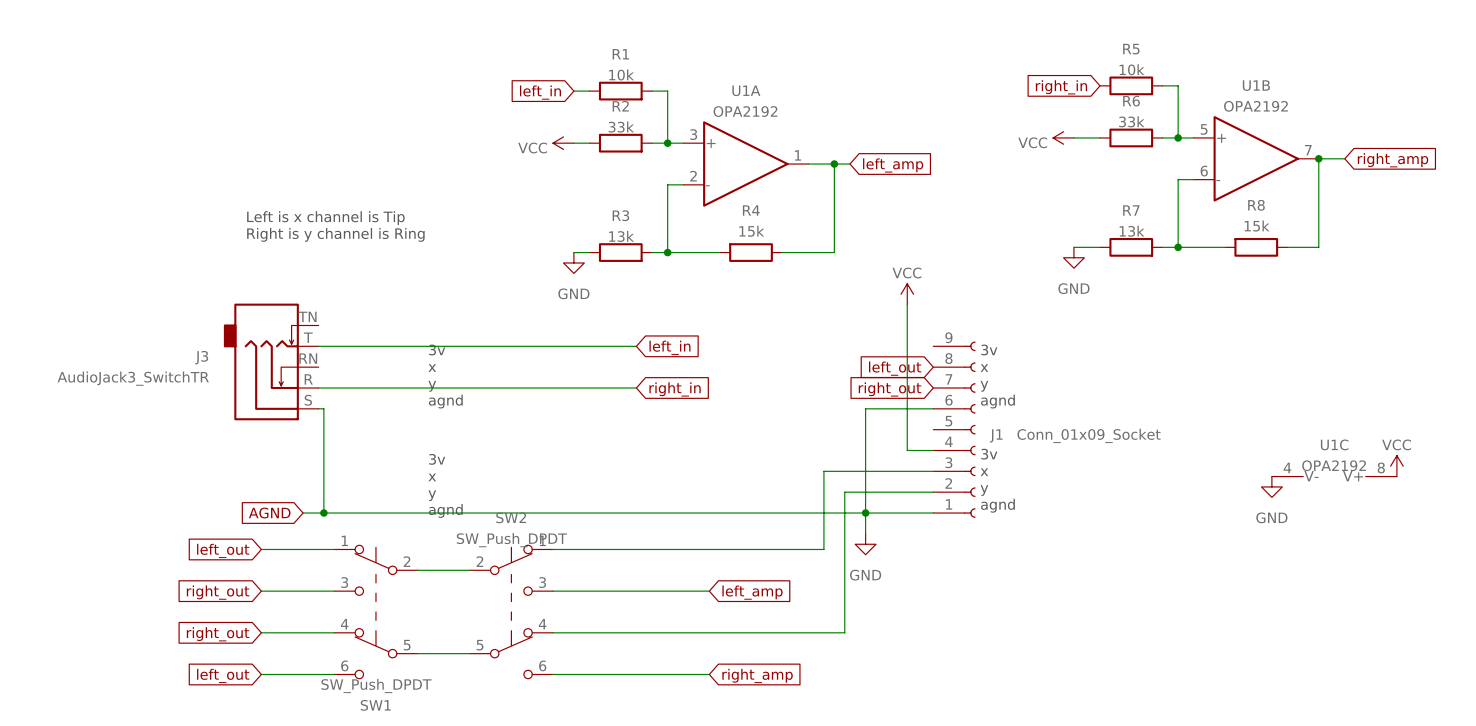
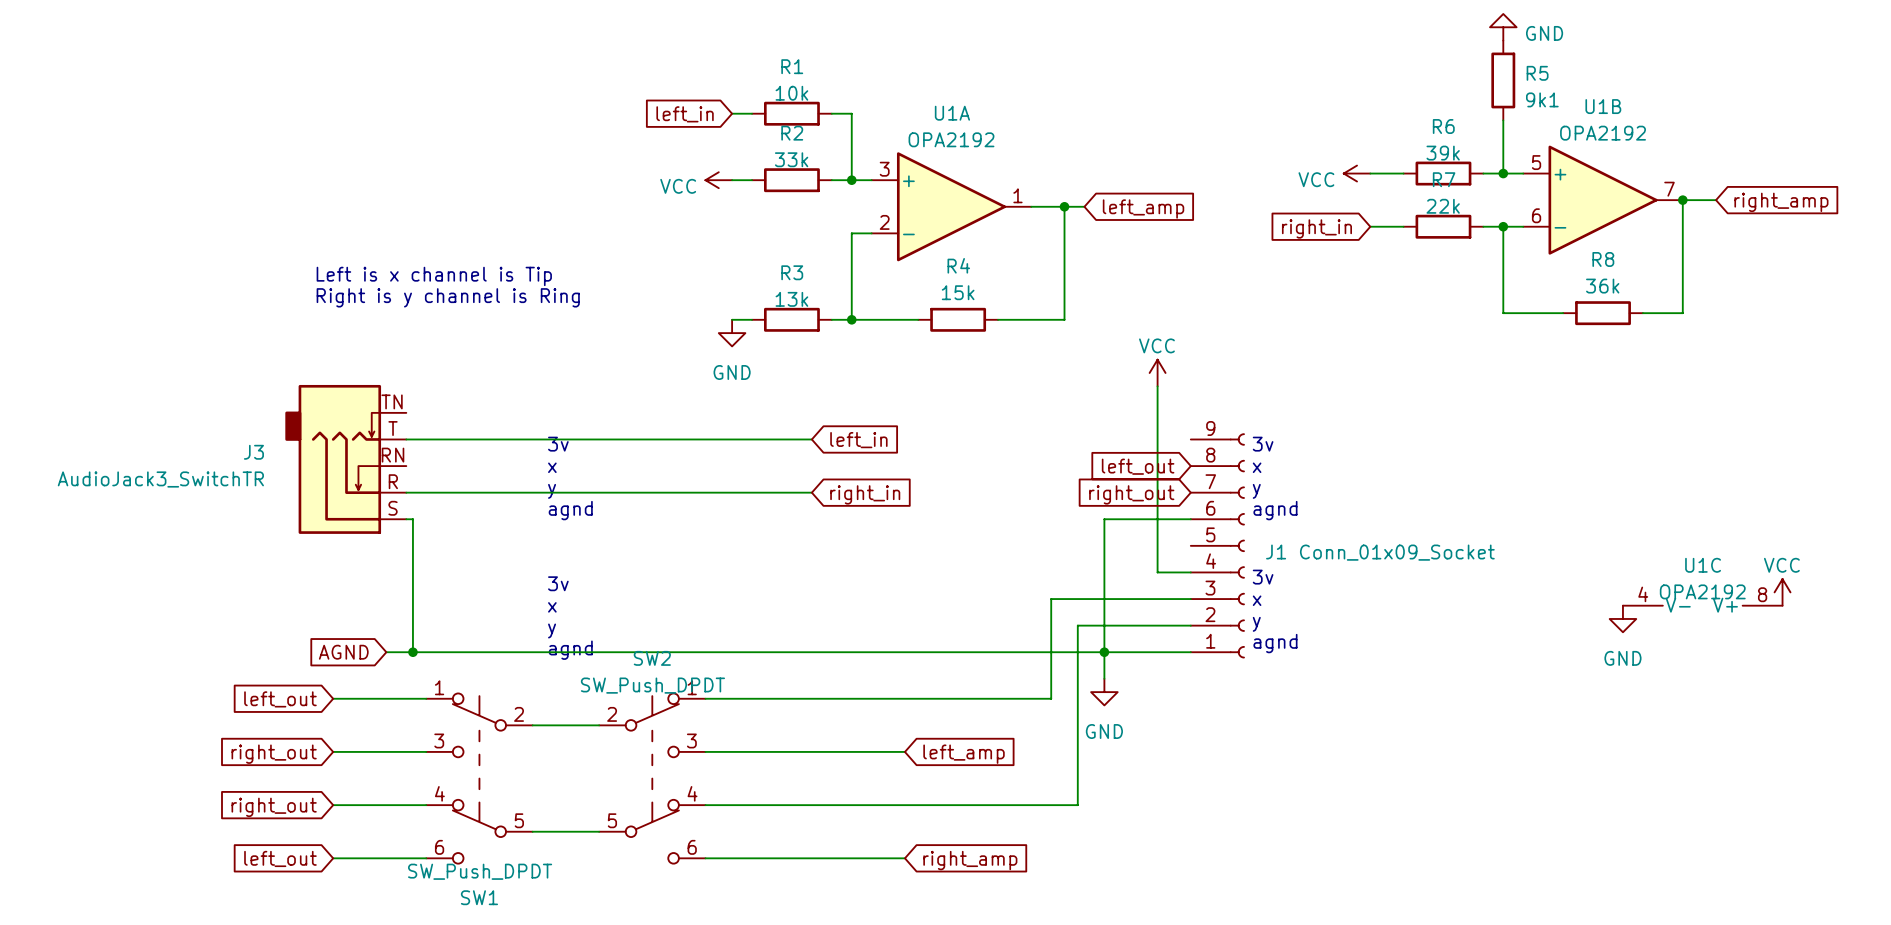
power symbol: none -> GND (1503, 27)
R5 value: 10k (1132, 69) -> 9k1 (1542, 99)
R5 rotation: 0° (1131, 85) -> 90° clockwise (1503, 80)
R5 position: (1131, 85) -> (1503, 80)
global label position: right_in (1061, 87) -> right_in (1316, 228)
R6 value: 33k (1131, 121) -> 39k (1443, 153)
junction: none -> (1503, 226)
R8 value: 15k (1257, 226) -> 36k (1602, 286)
R7 value: 13k (1132, 231) -> 22k (1443, 206)
wire: (1073, 247) (1100, 247) -> (1370, 226) (1403, 226)
R7 position: (1131, 247) -> (1443, 226)
wire: (1162, 247) (1178, 247) -> (1483, 226) (1503, 226)
junction: (1178, 247) -> none
power symbol: GND (1073, 257) -> none

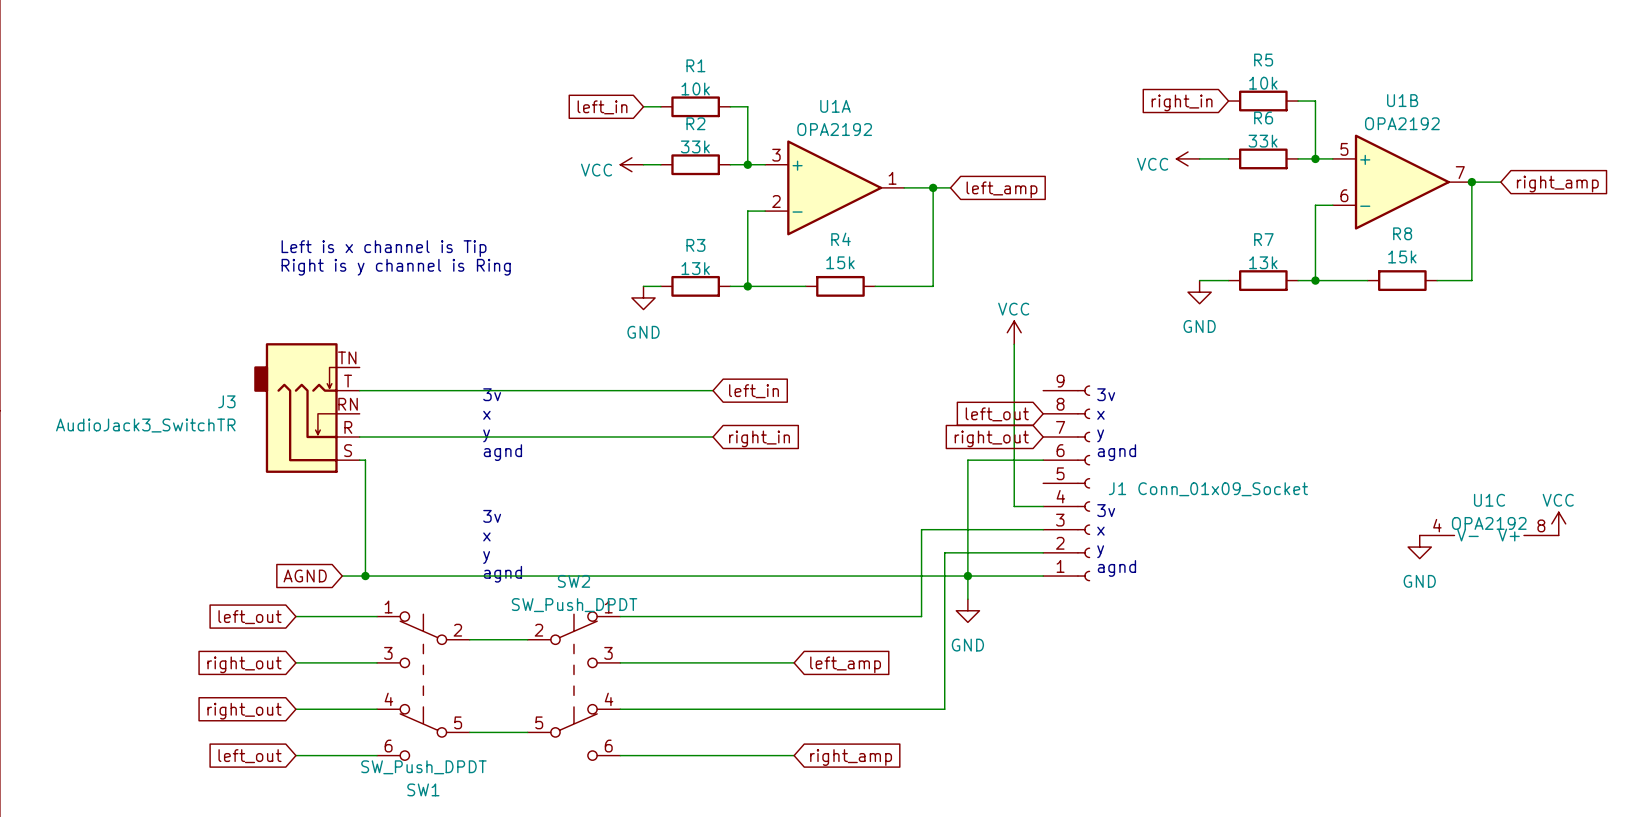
power symbol: GND (1503, 27) -> none
R5 name position: R5 (1537, 73) -> R5 (1263, 60)
R5 rotation: 0° (1503, 80) -> 90° clockwise (1263, 101)
R5 position: (1503, 80) -> (1263, 101)
R5 value: 9k1 (1542, 99) -> 10k (1263, 83)
R6 value: 39k (1443, 153) -> 33k (1263, 141)
R7 value: 22k (1443, 206) -> 13k (1263, 262)
wire: (1370, 226) (1403, 226) -> (1199, 280) (1228, 280)
R7 position: (1443, 226) -> (1263, 280)
wire: (1483, 226) (1503, 226) -> (1298, 280) (1315, 280)
junction: (1503, 226) -> none
global label position: right_in (1316, 228) -> right_in (1182, 102)
R8 value: 36k (1602, 286) -> 15k (1402, 256)
junction: none -> (1315, 280)
power symbol: none -> GND (1199, 292)

